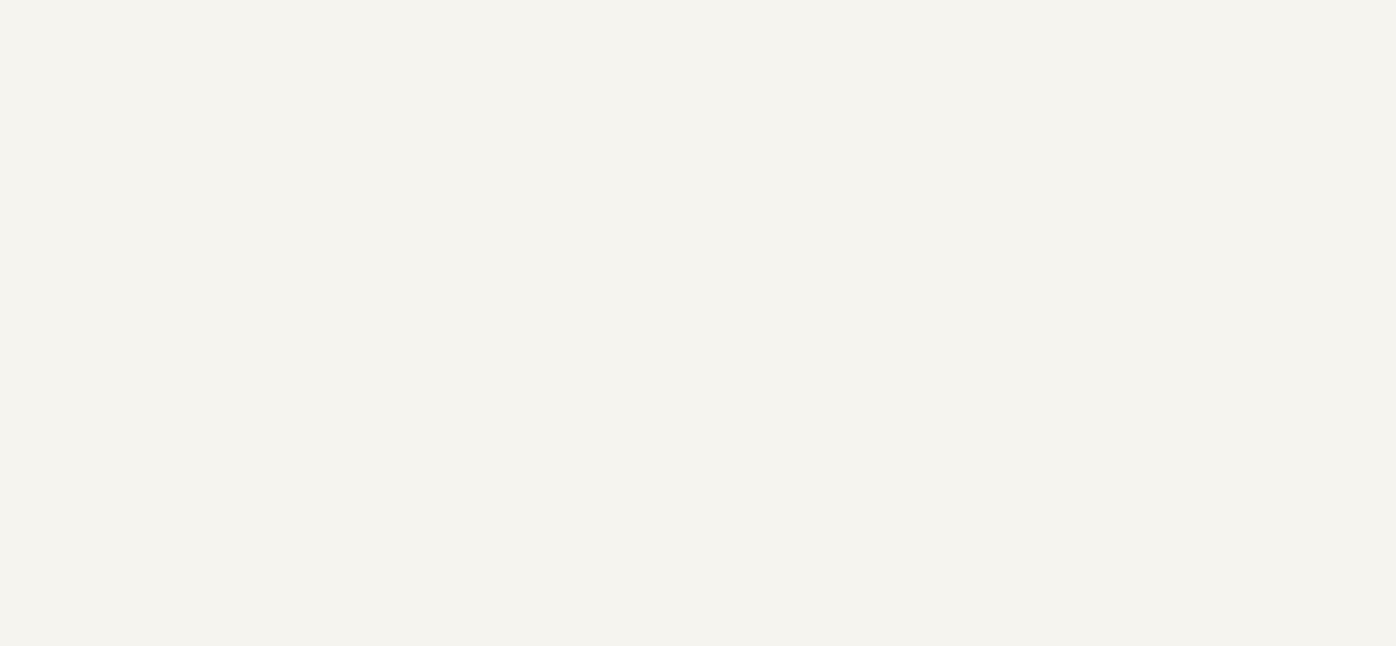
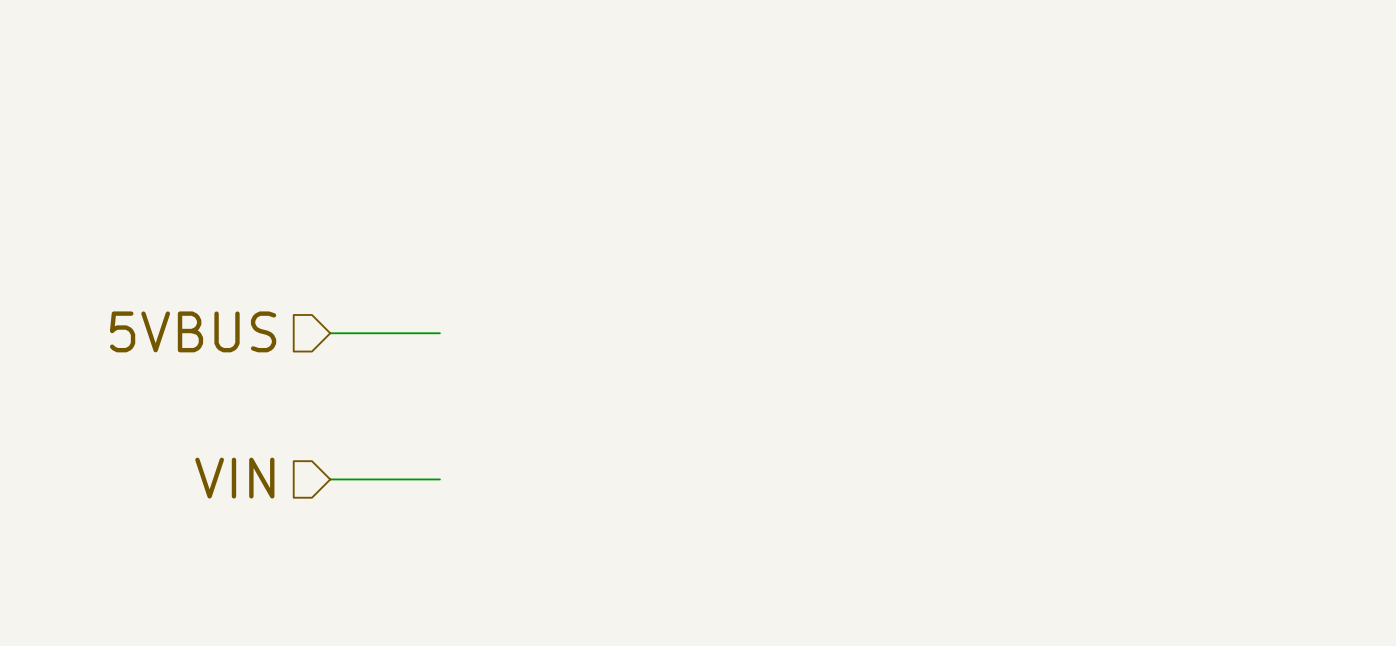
hierarchical label: none -> 5VBUS (193, 331)
wire: none -> (330, 333) (439, 333)
hierarchical label: none -> VIN (234, 478)
wire: none -> (330, 479) (439, 479)

